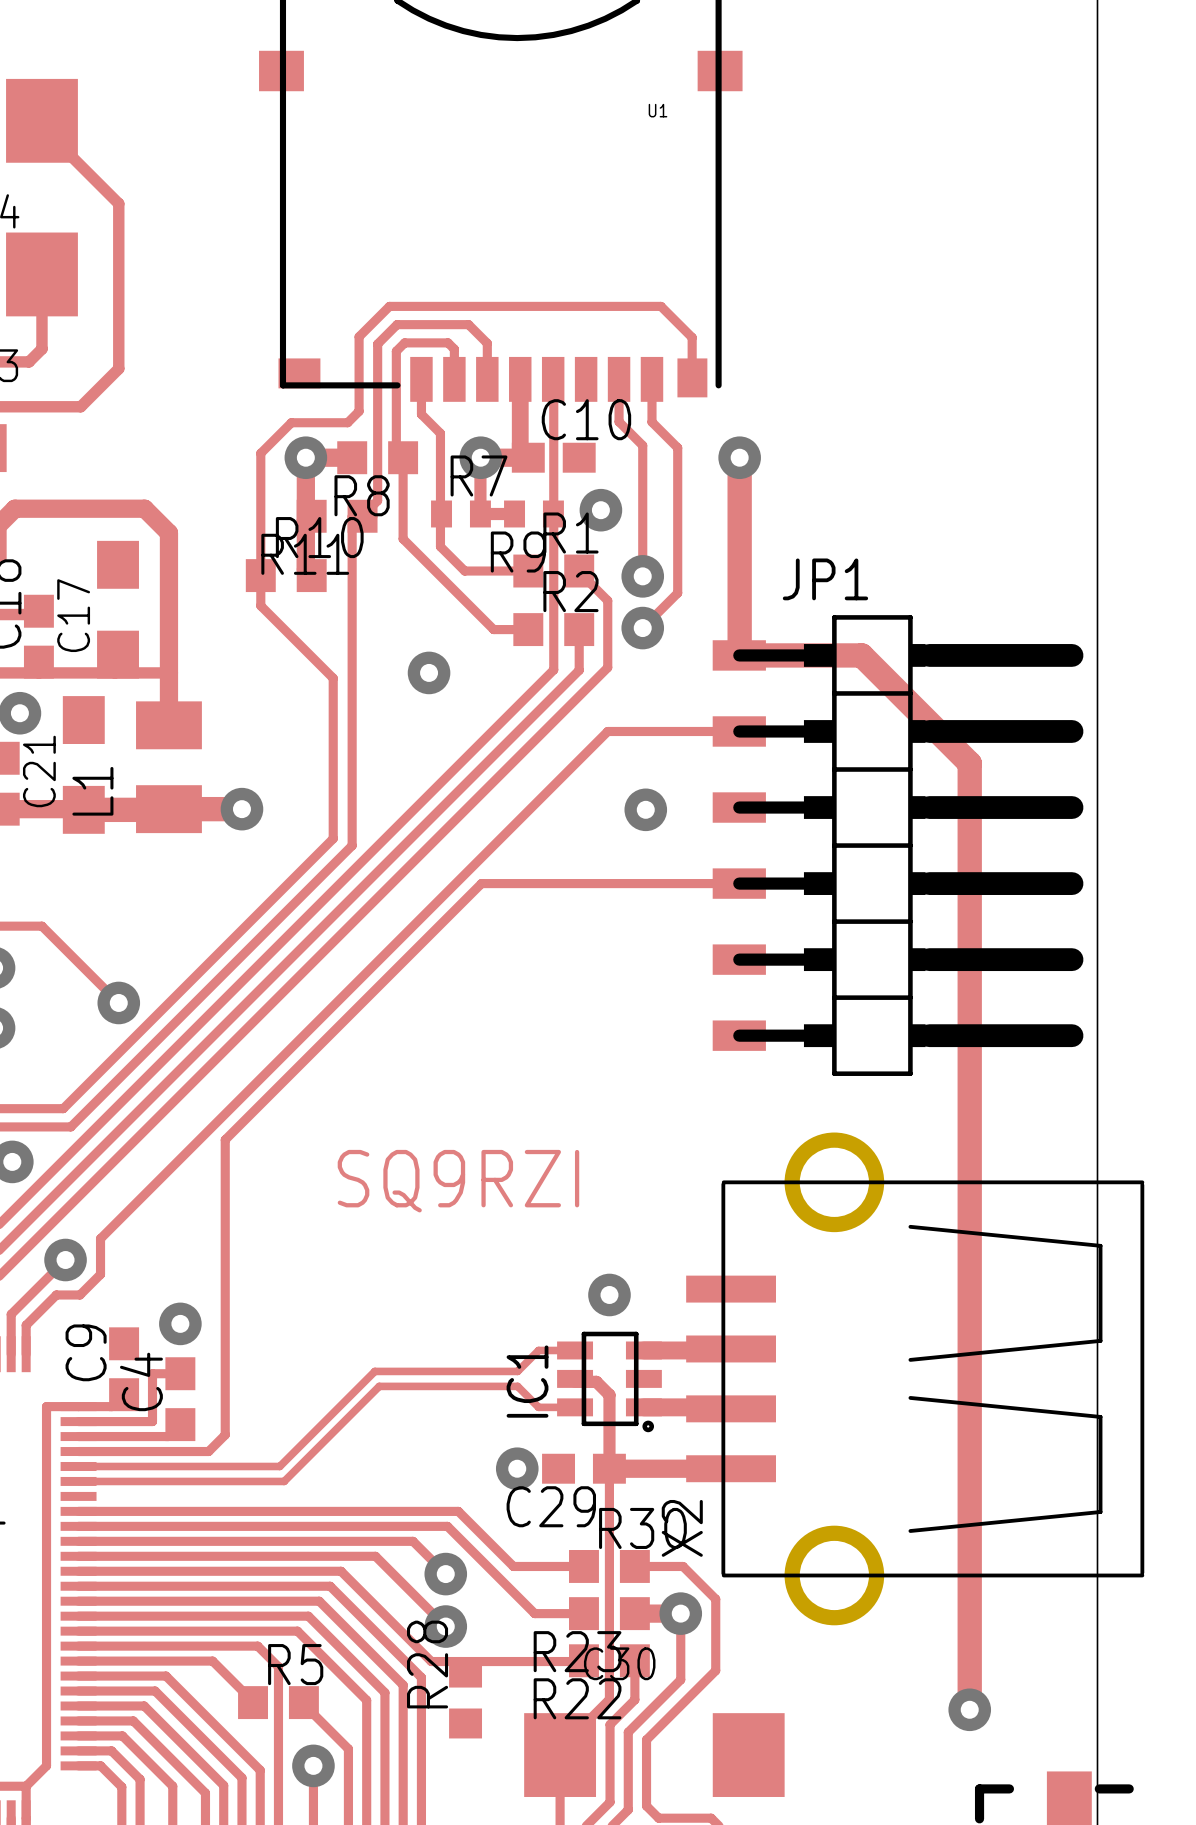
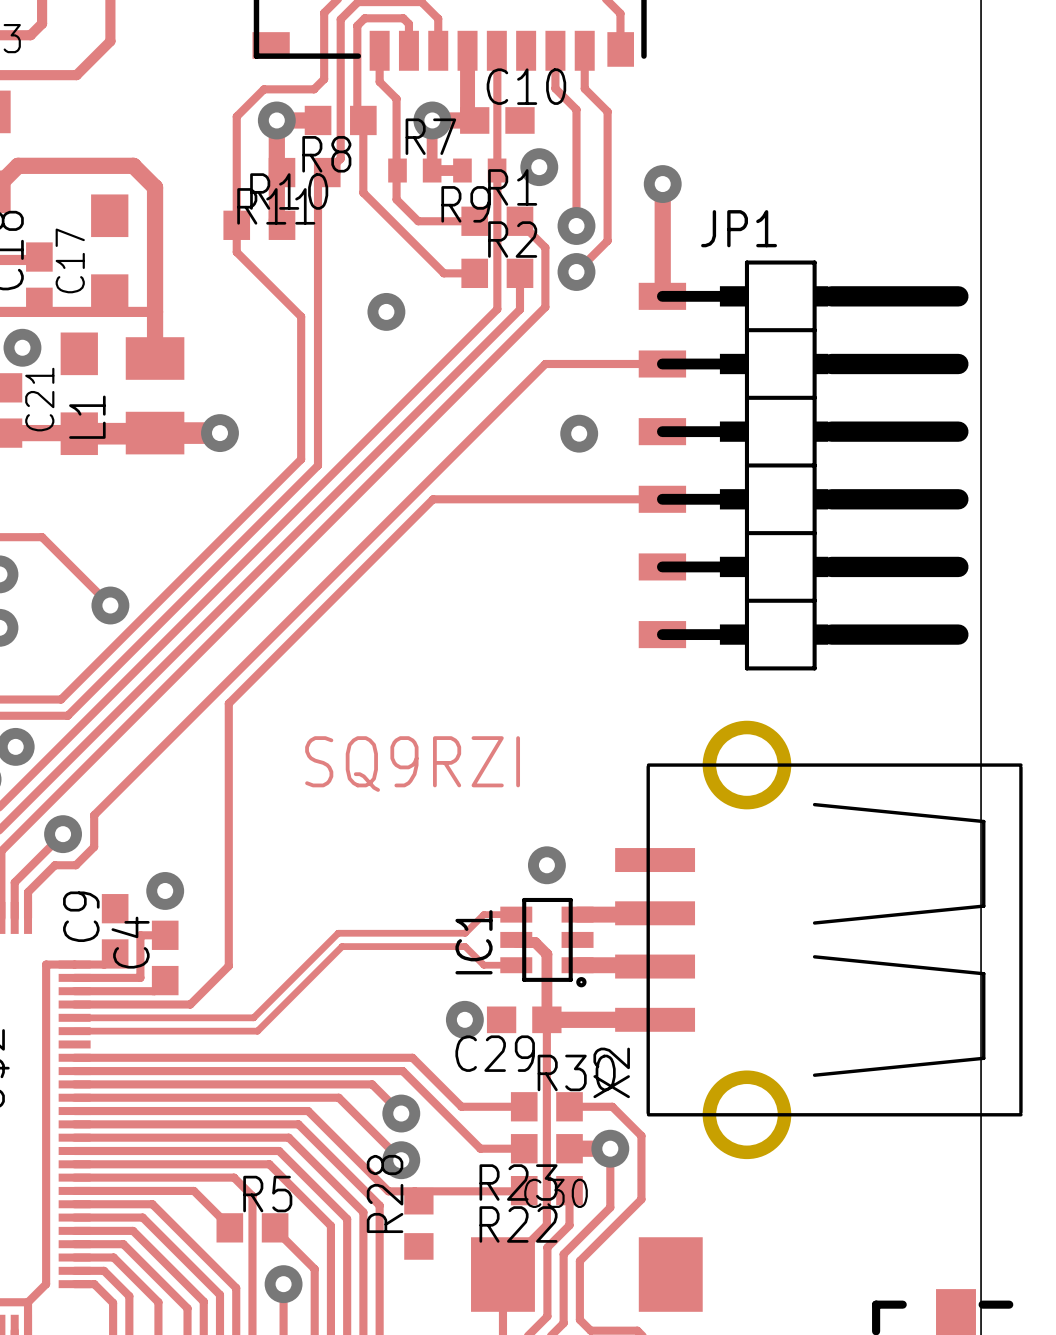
track: (739, 457) (739, 529) -> none
via position: (739, 457) -> (662, 184)
track width: thick (739, 529) (739, 655) -> thin (662, 184) (662, 296)
track: (739, 655) (861, 655) (969, 763) (969, 1709) -> none
track: (251, 1113) (225, 1139) (225, 1434) -> (228, 703) (228, 966) (205, 989)
via: (969, 1709) -> none

